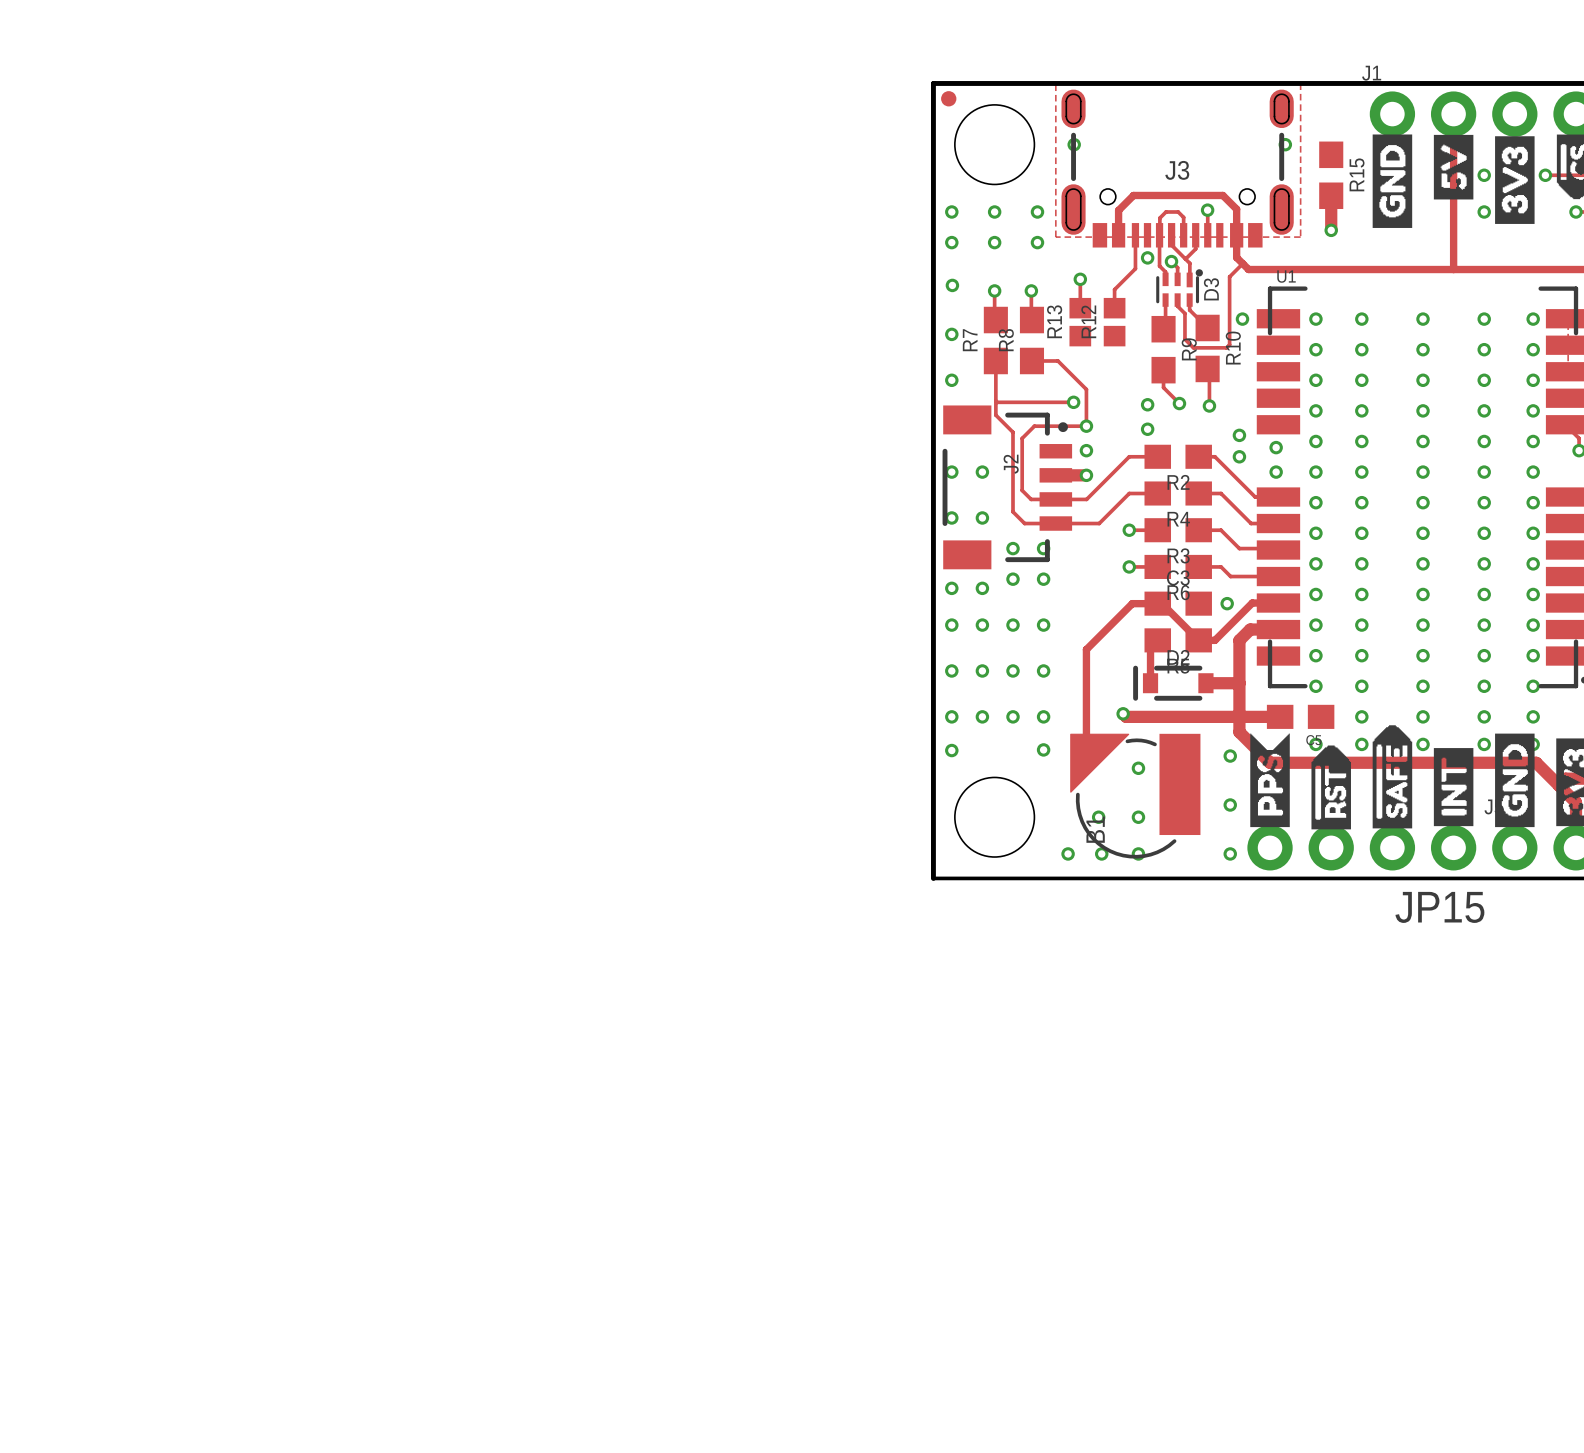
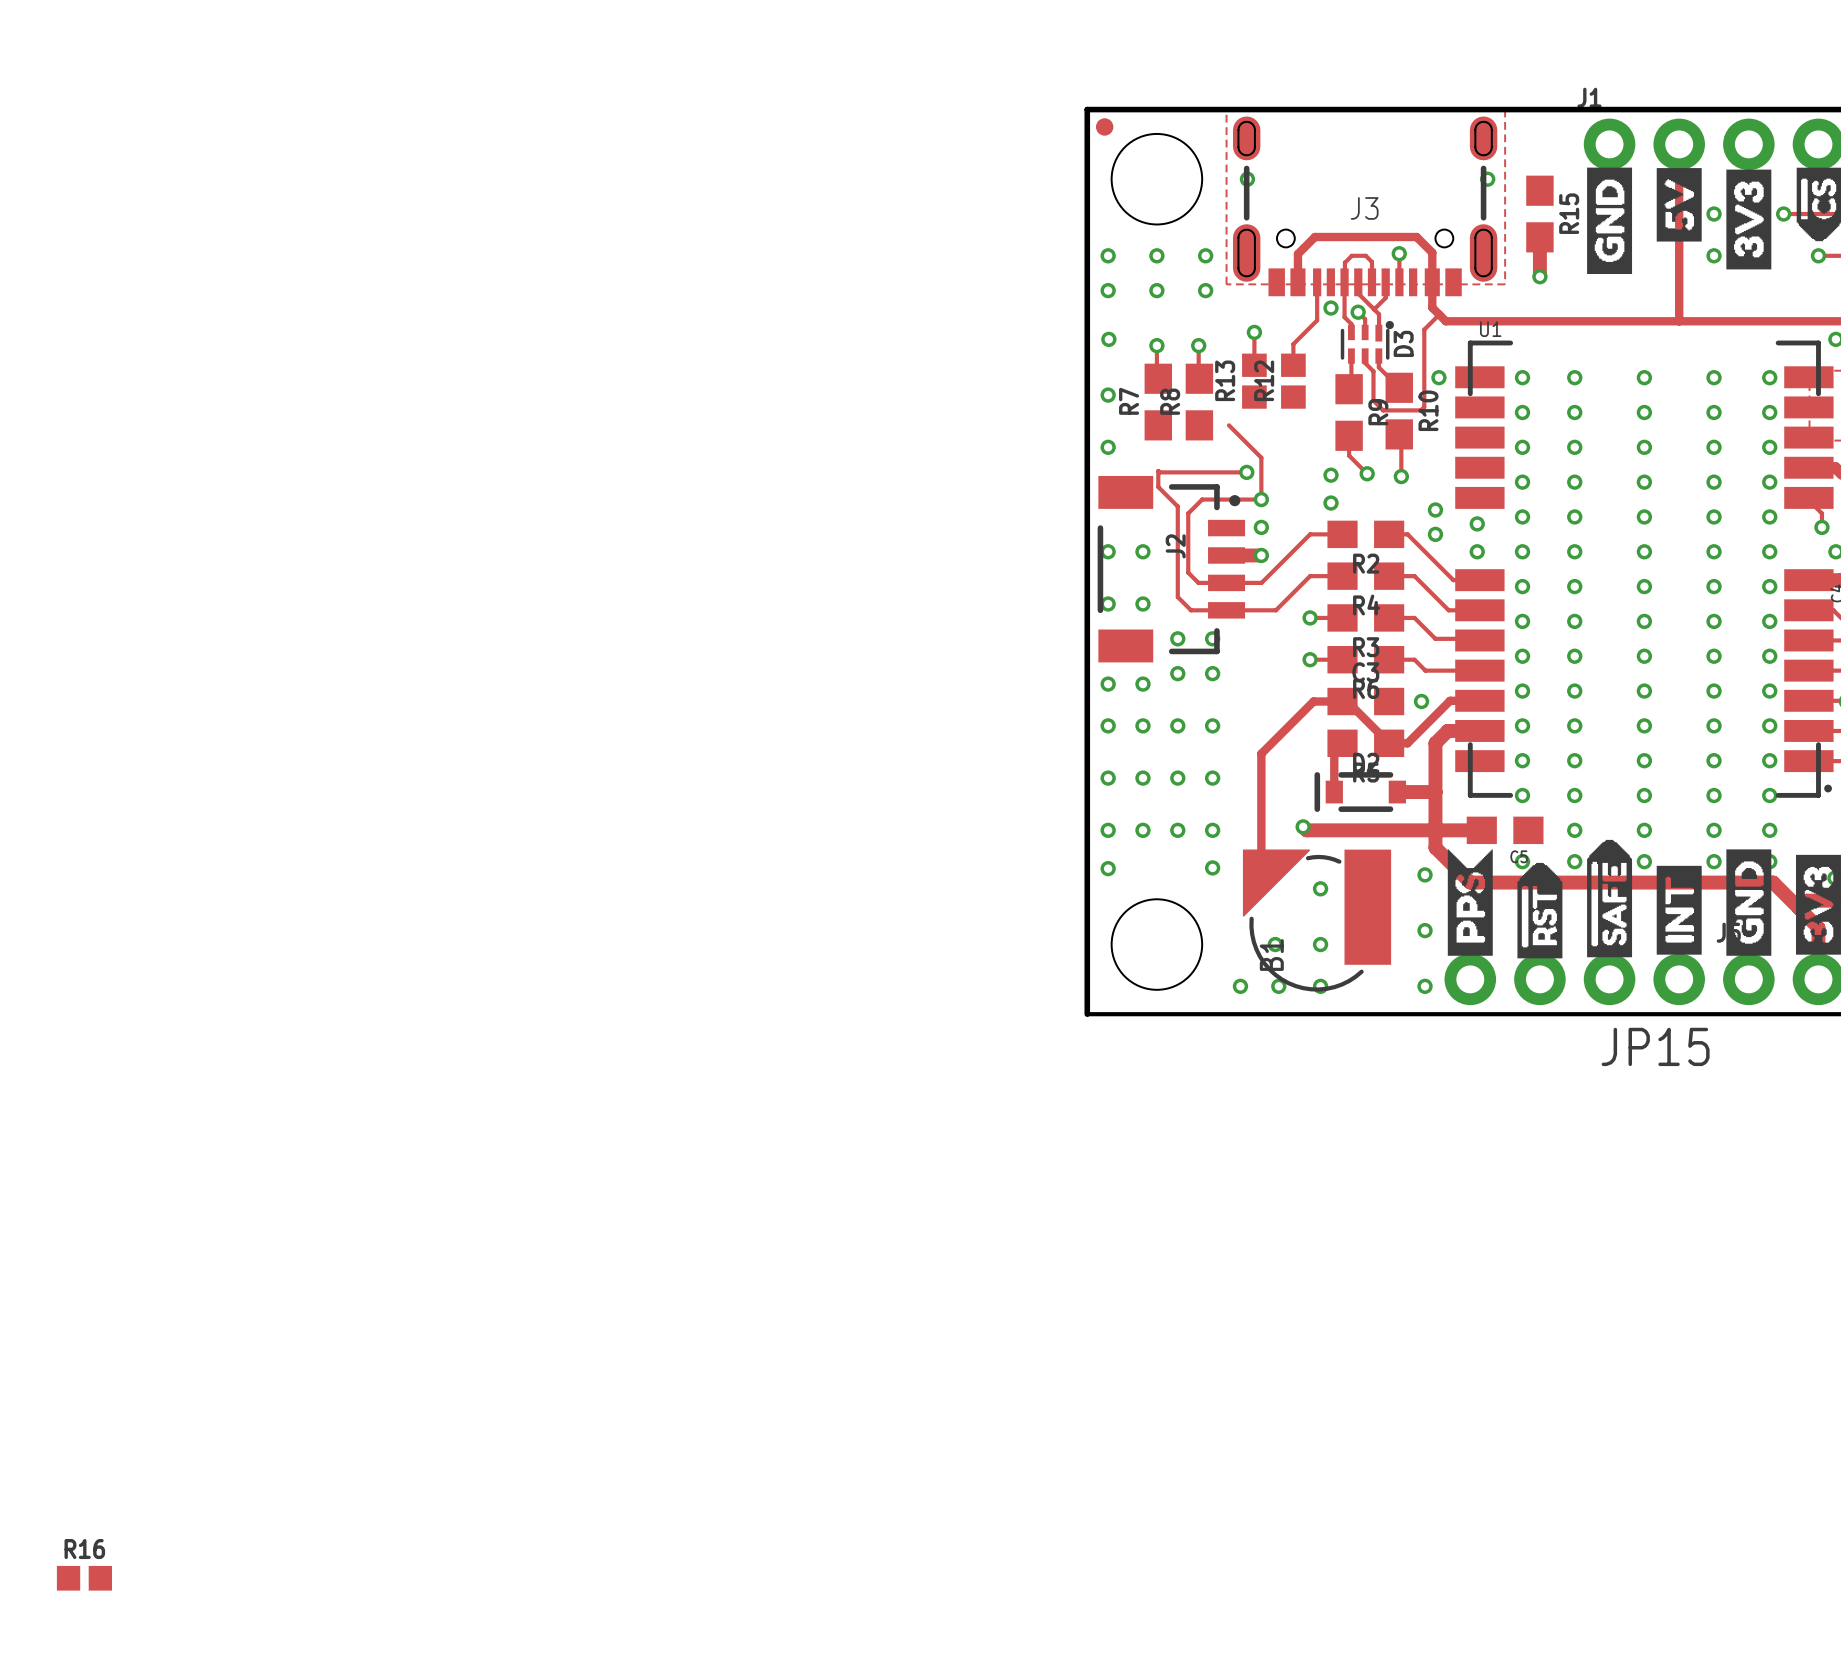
track: (995, 360) (995, 401) -> none
track: (1031, 360) (1057, 360) -> none
R16: none -> (84, 1578)

